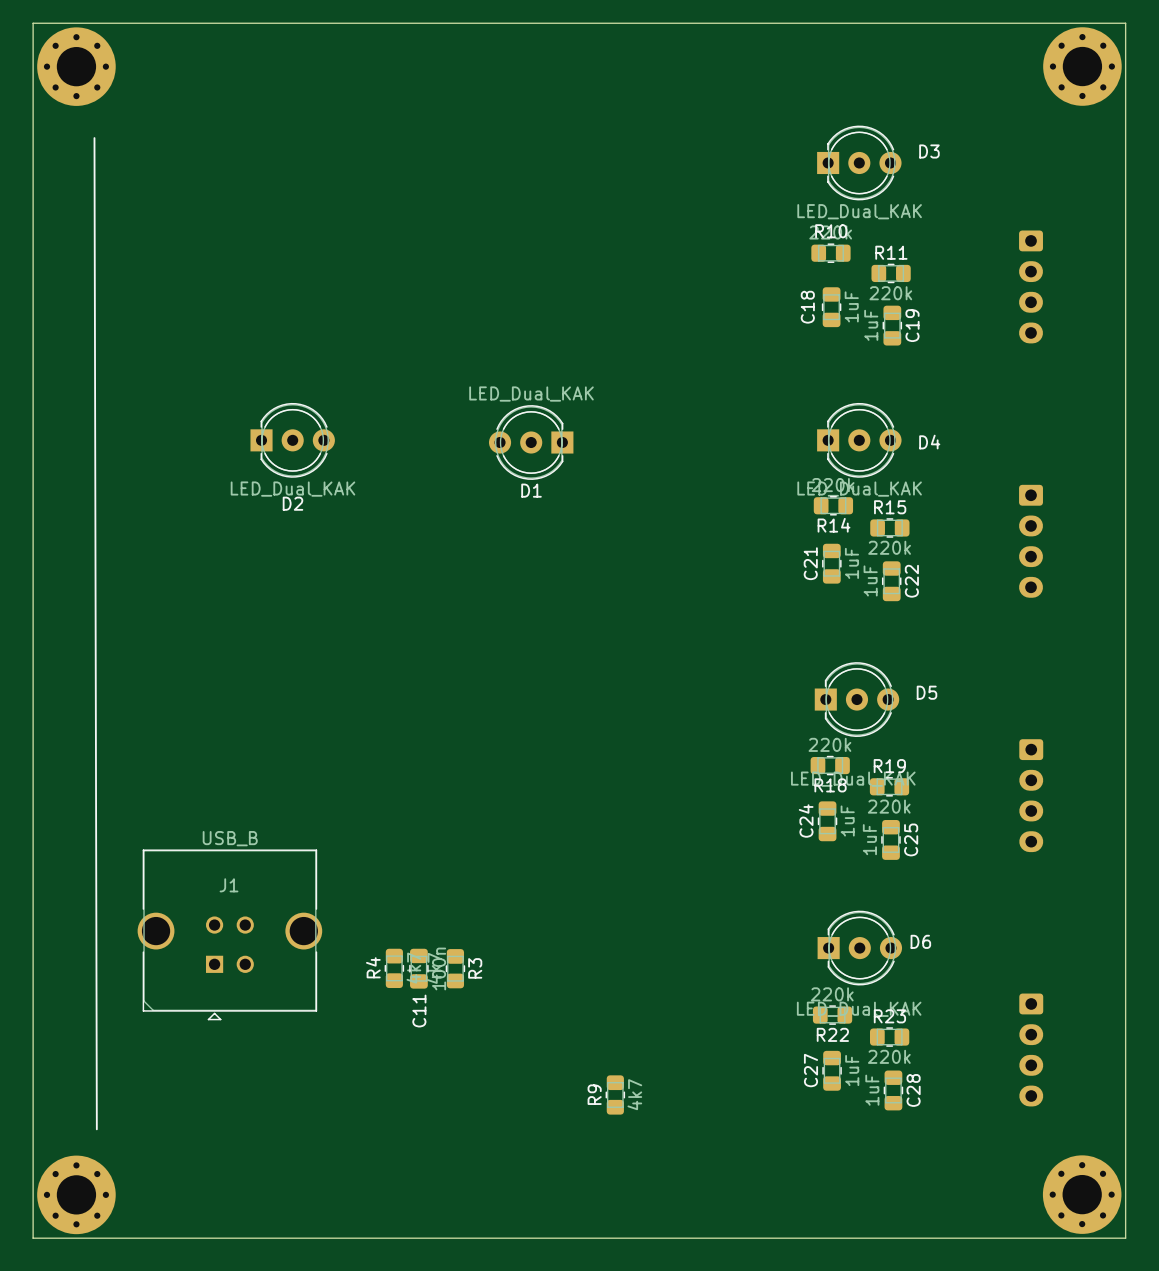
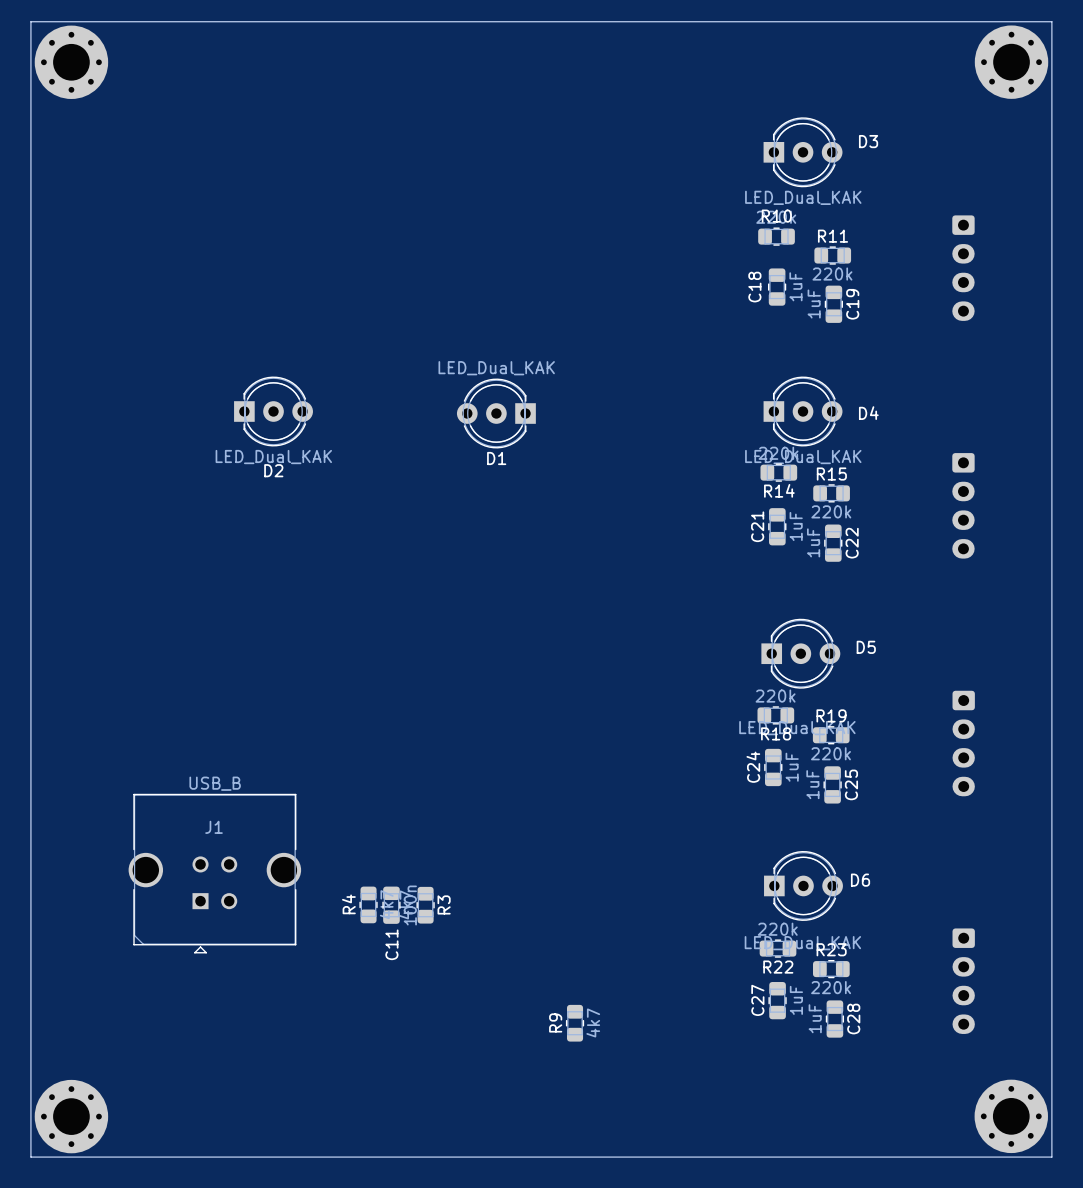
line: (94, 138) (96, 1129) -> none

